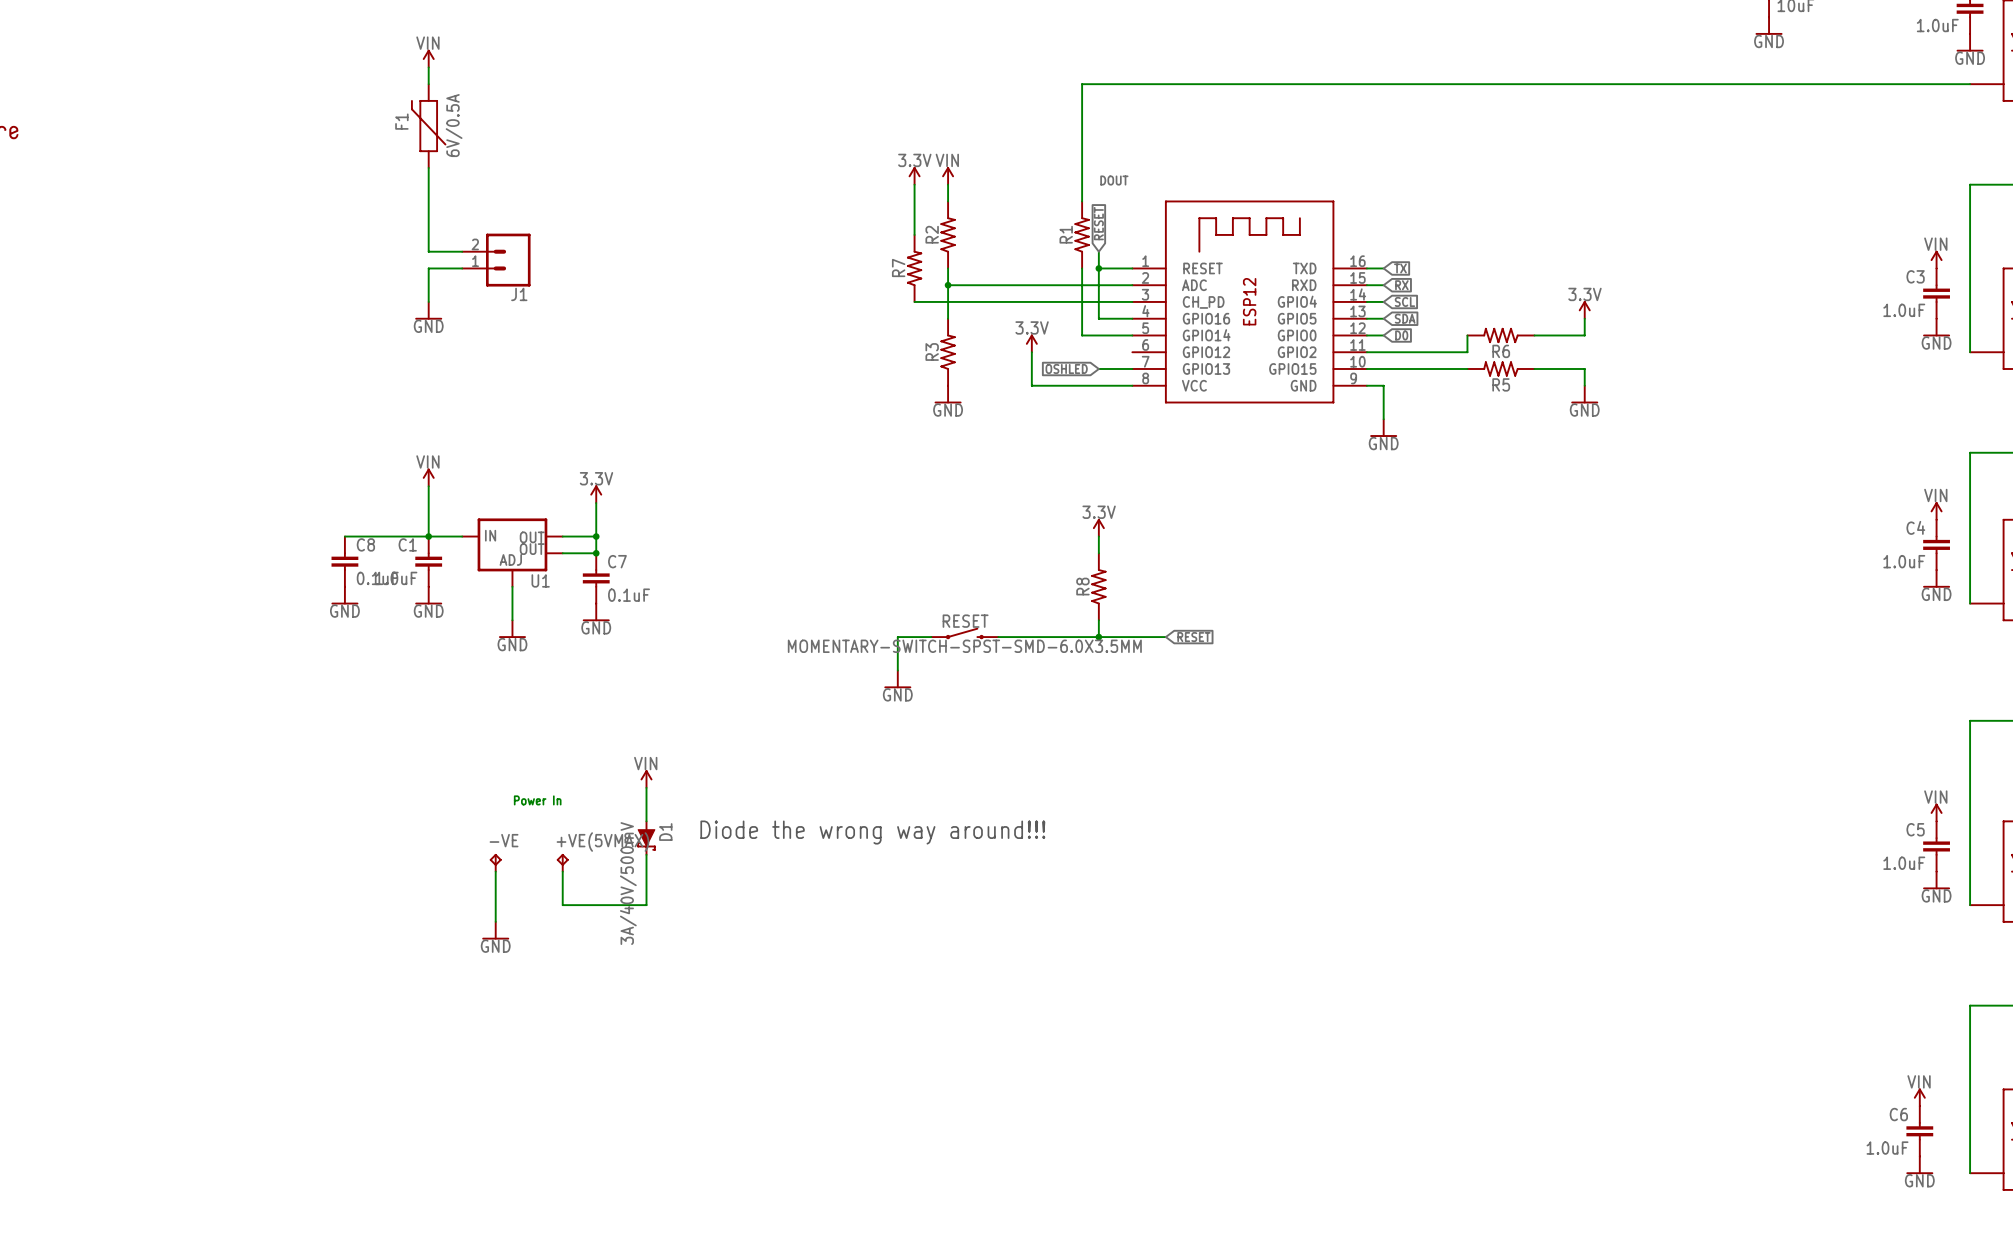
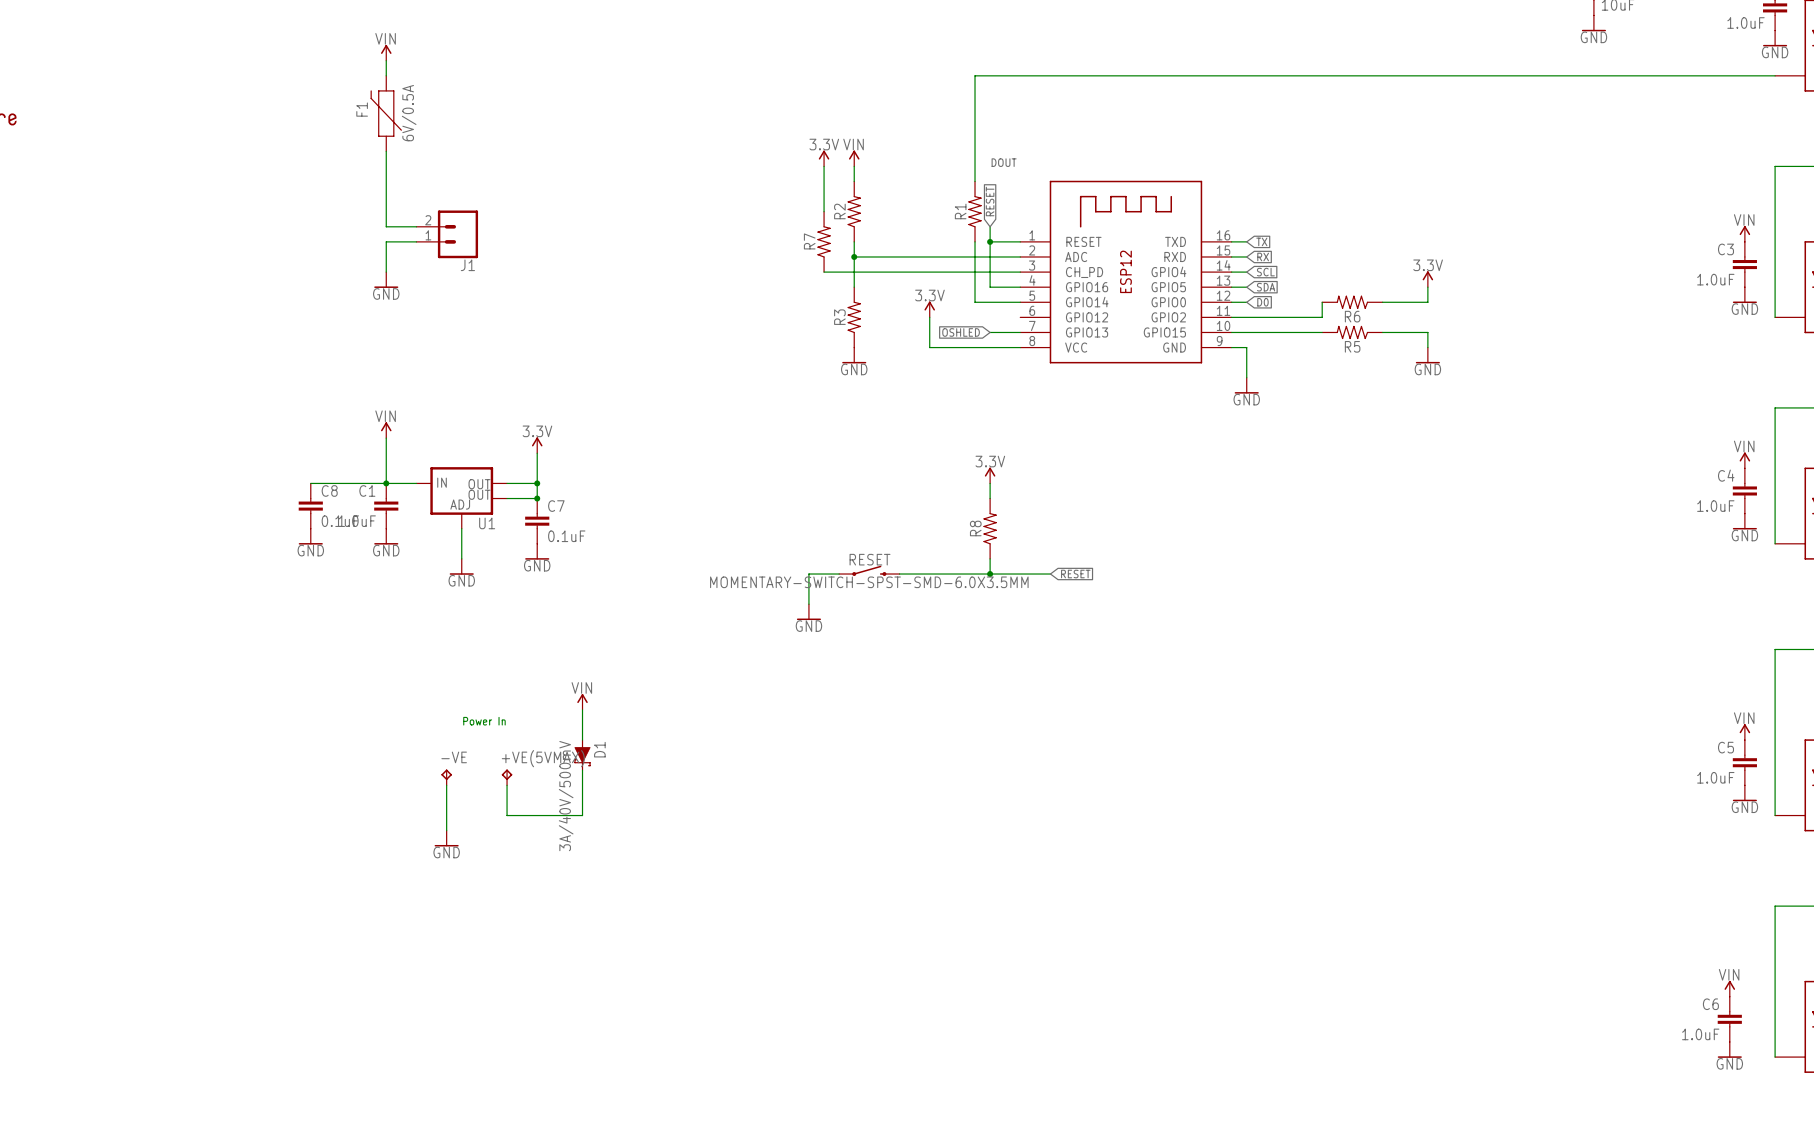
text: Diode the wrong way around!!! (872, 832) -> none

